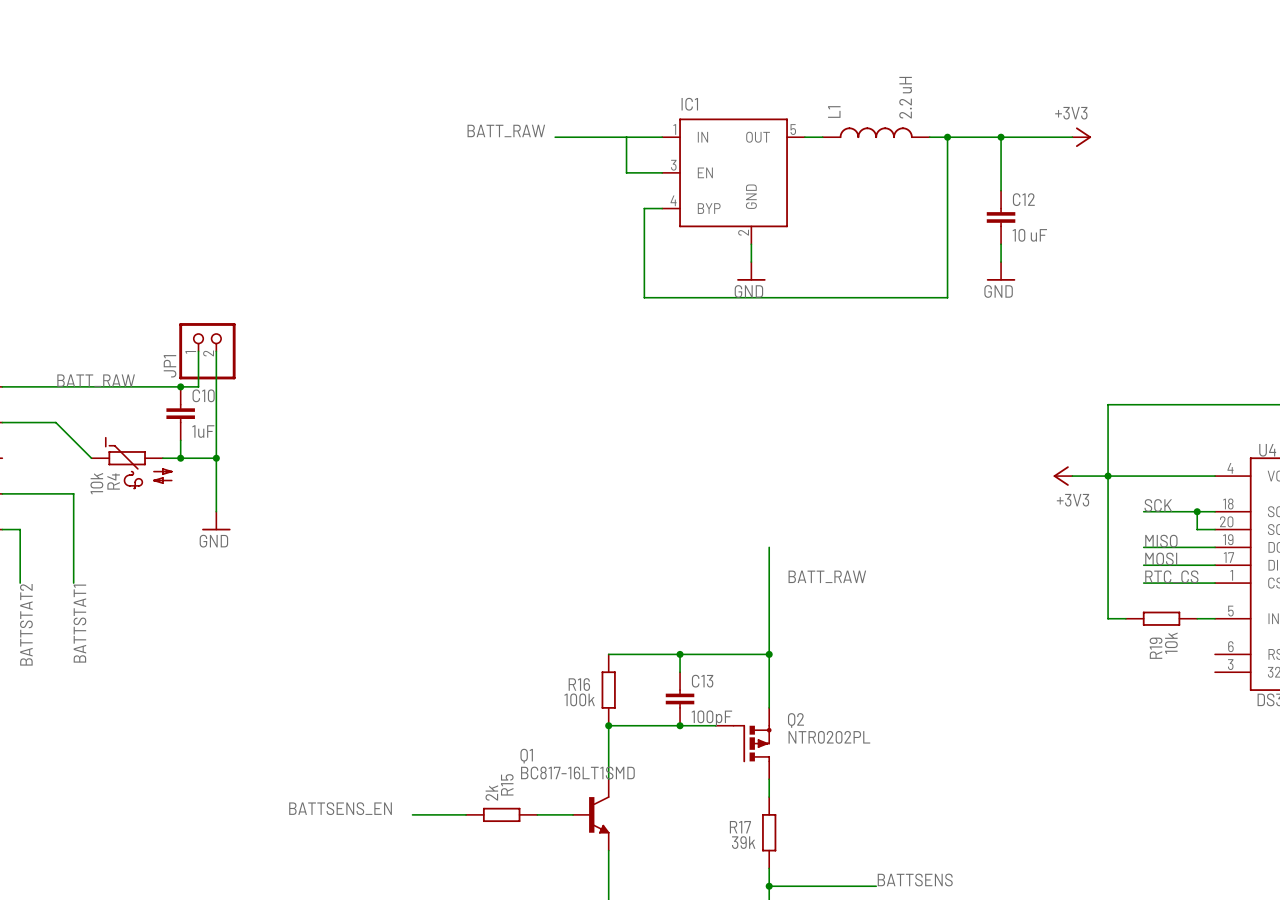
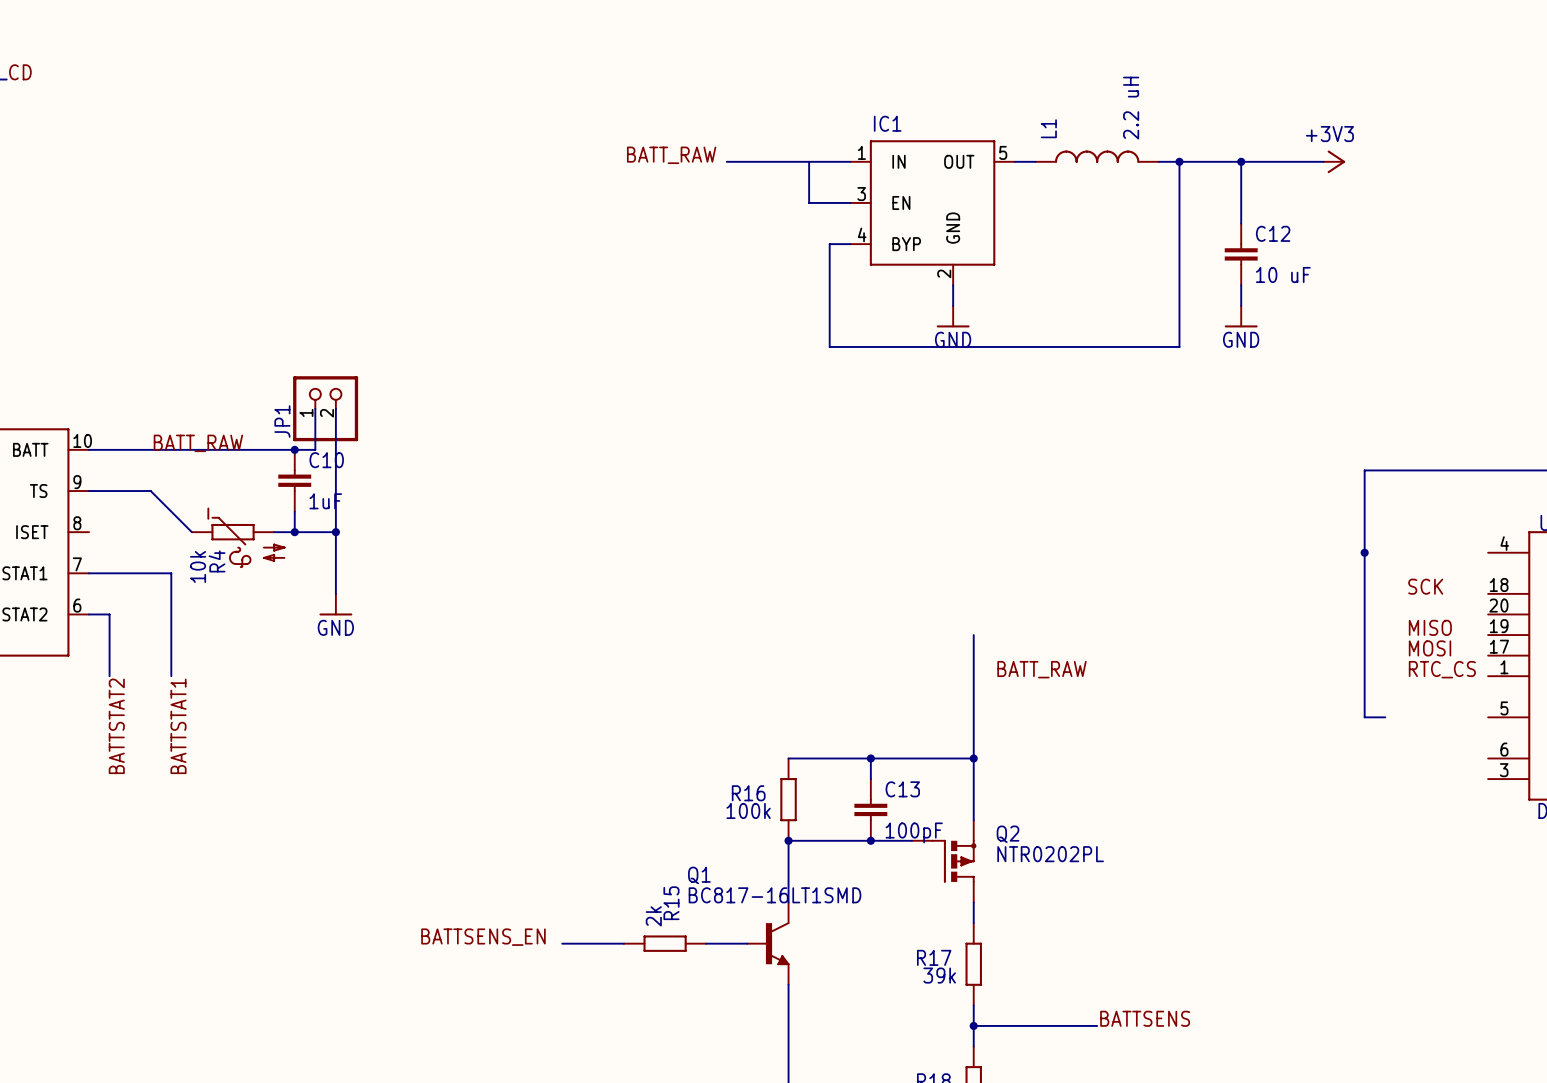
power symbol: +3V3 (1063, 476) -> none
wire: (1072, 476) (1215, 476) -> none
wire: (1143, 511) (1215, 511) -> none
wire: (1197, 511) (1197, 529) (1215, 529) -> none
junction: (1197, 511) -> none
wire: (1143, 547) (1215, 547) -> none
wire: (1143, 565) (1215, 565) -> none
wire: (1143, 583) (1215, 583) -> none
R19: 10k (1161, 618) -> none
wire: (1197, 618) (1215, 618) -> none

